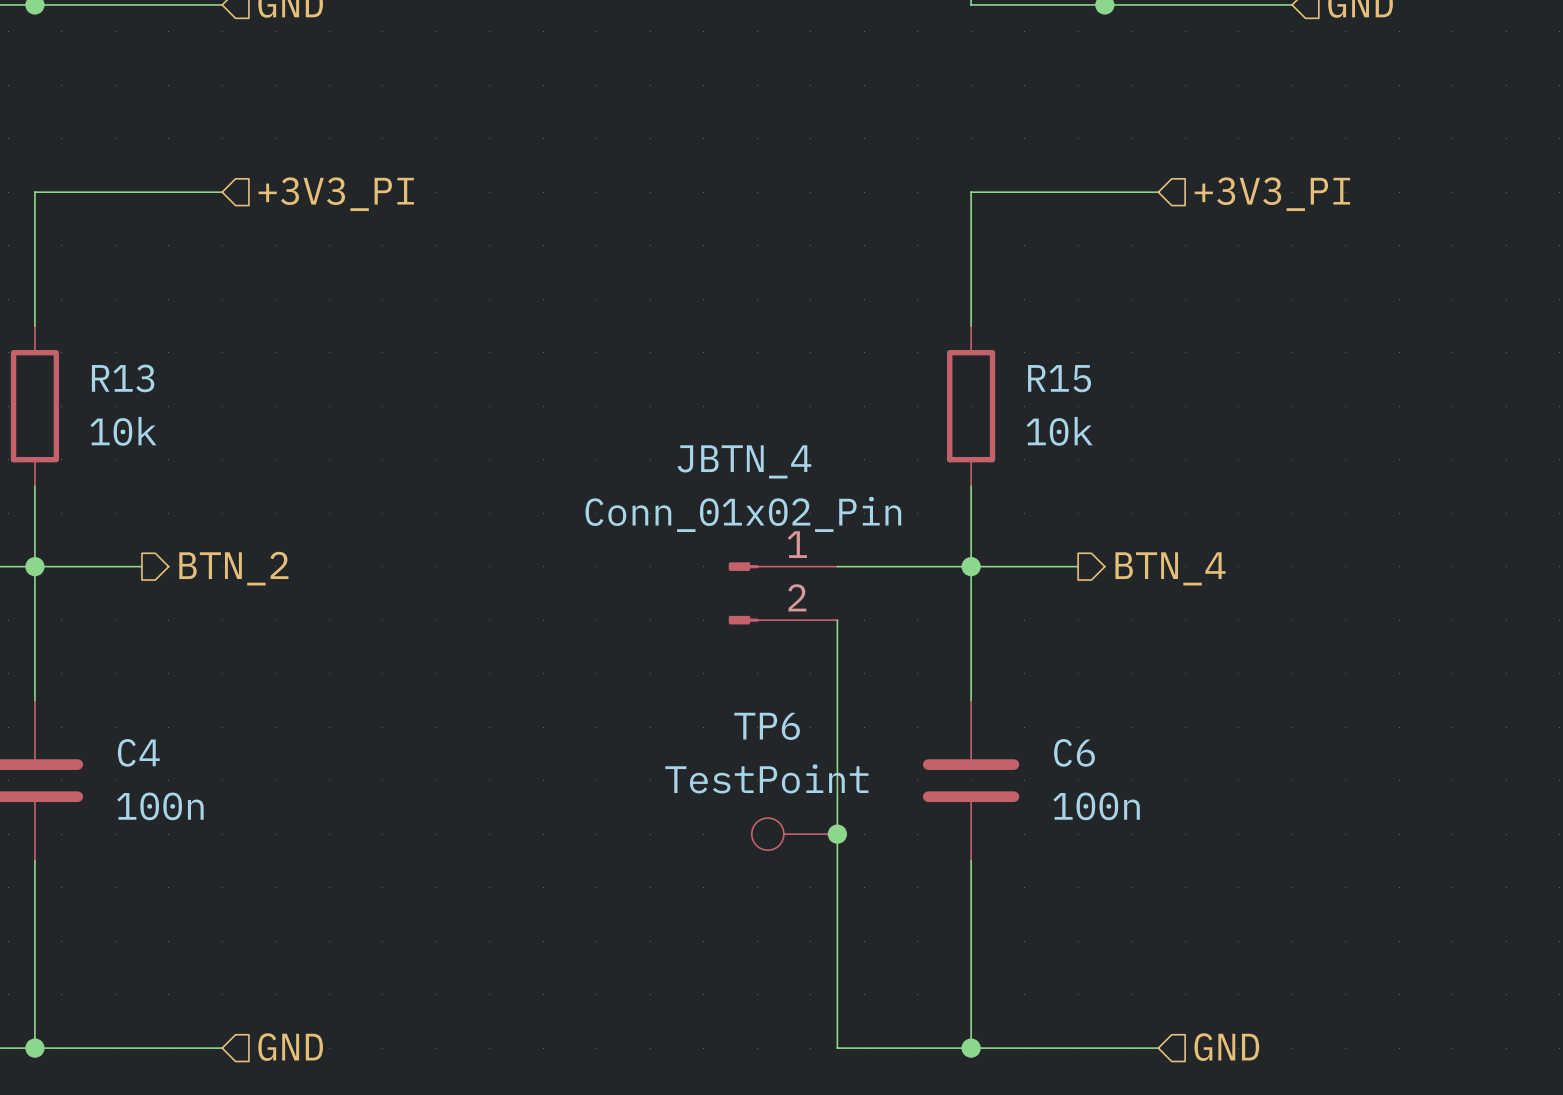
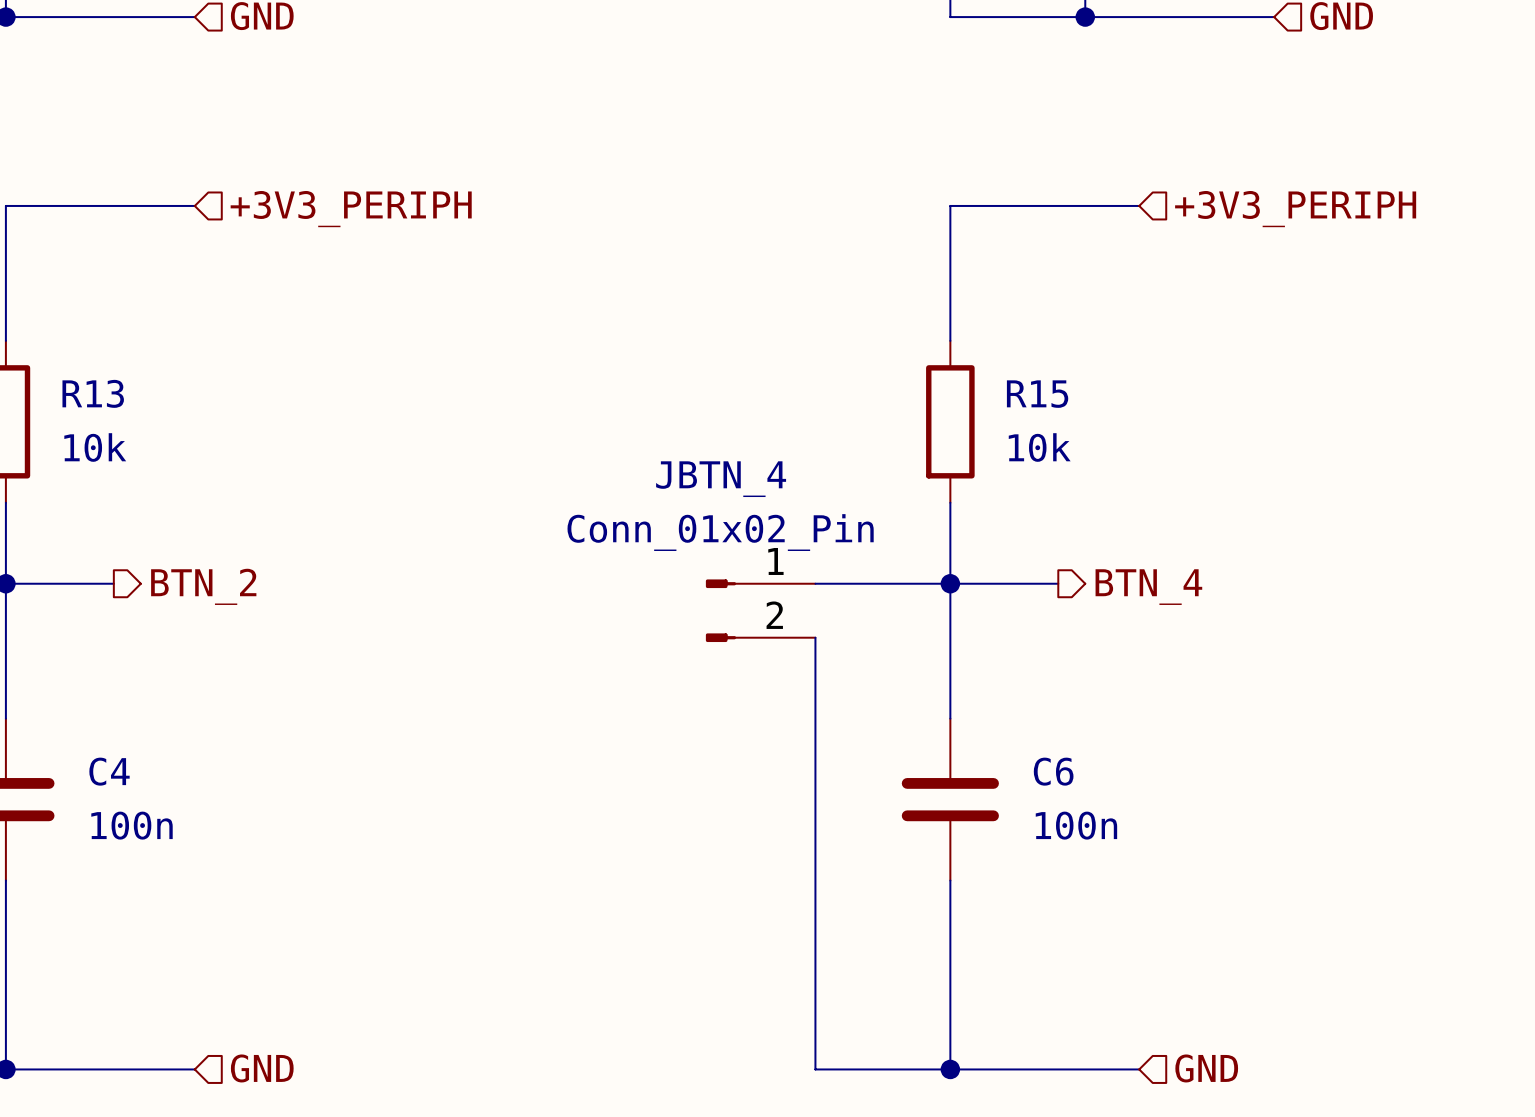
hierarchical label: +3V3_PI (336, 194) -> +3V3_PERIPH (351, 209)
hierarchical label: +3V3_PI (1272, 194) -> +3V3_PERIPH (1295, 209)
TP6: TestPoint (794, 834) -> none
junction: (837, 834) -> none

